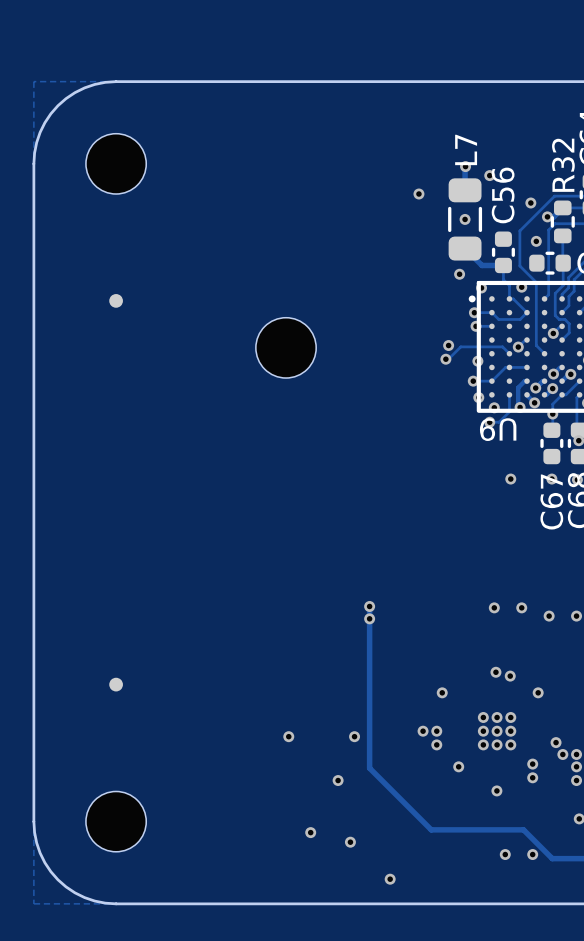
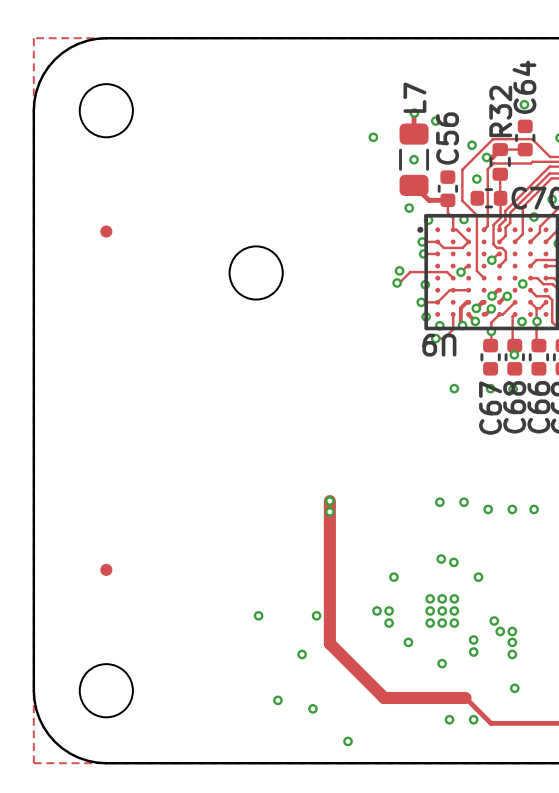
track width: thin (369, 606) (369, 768) (431, 829) (523, 829) -> thick (329, 501) (329, 643) (384, 697) (465, 697)

